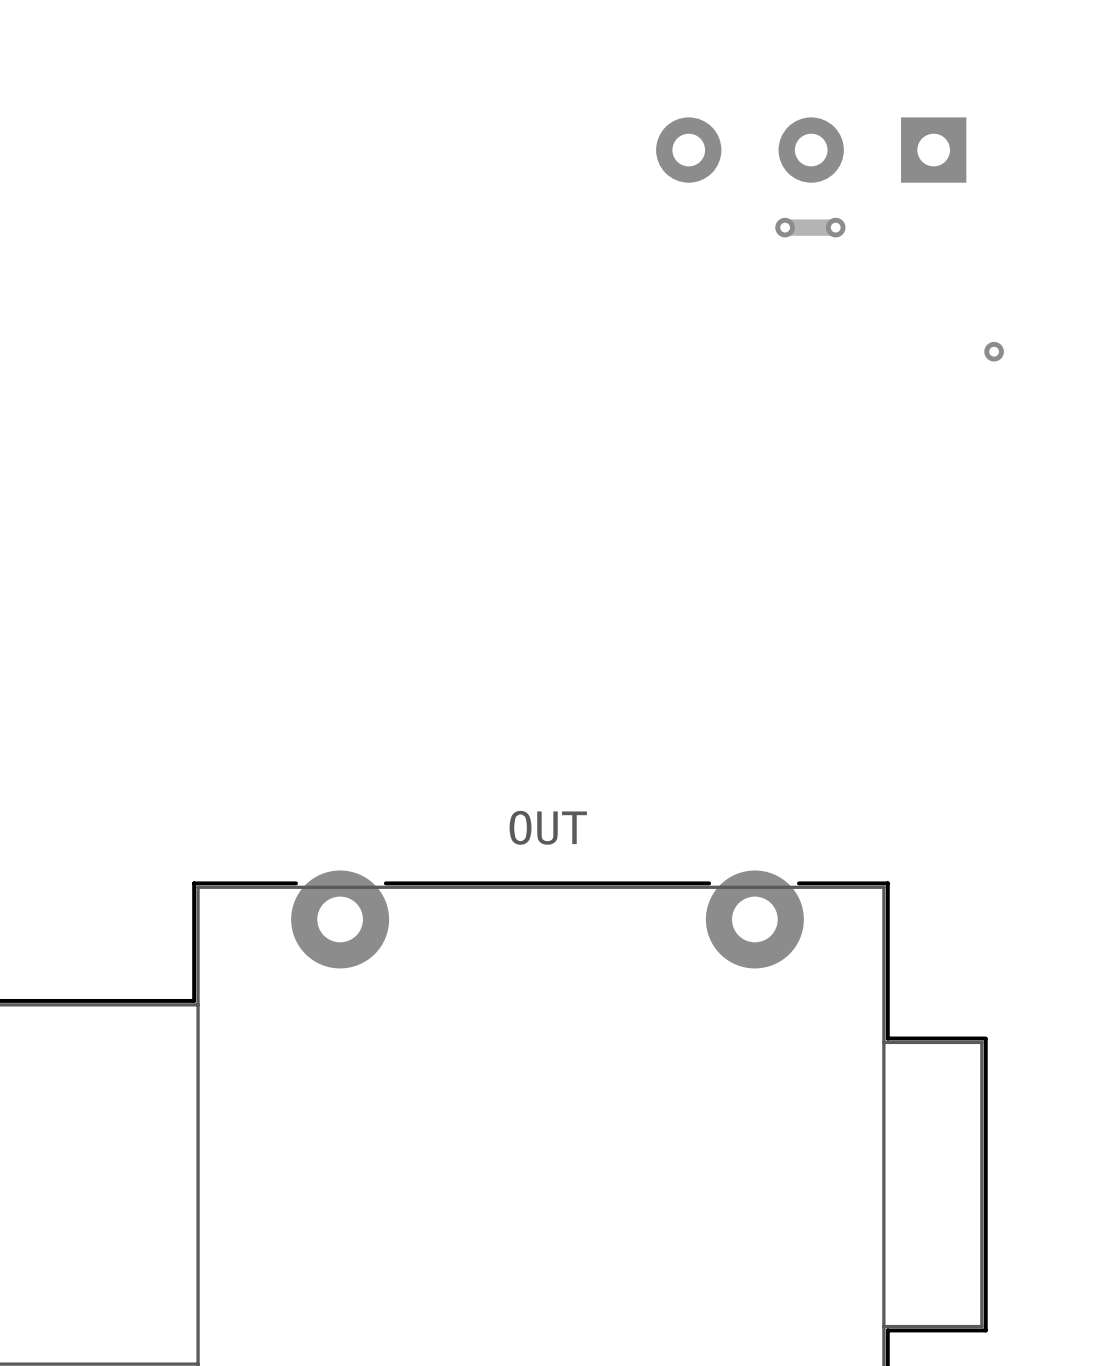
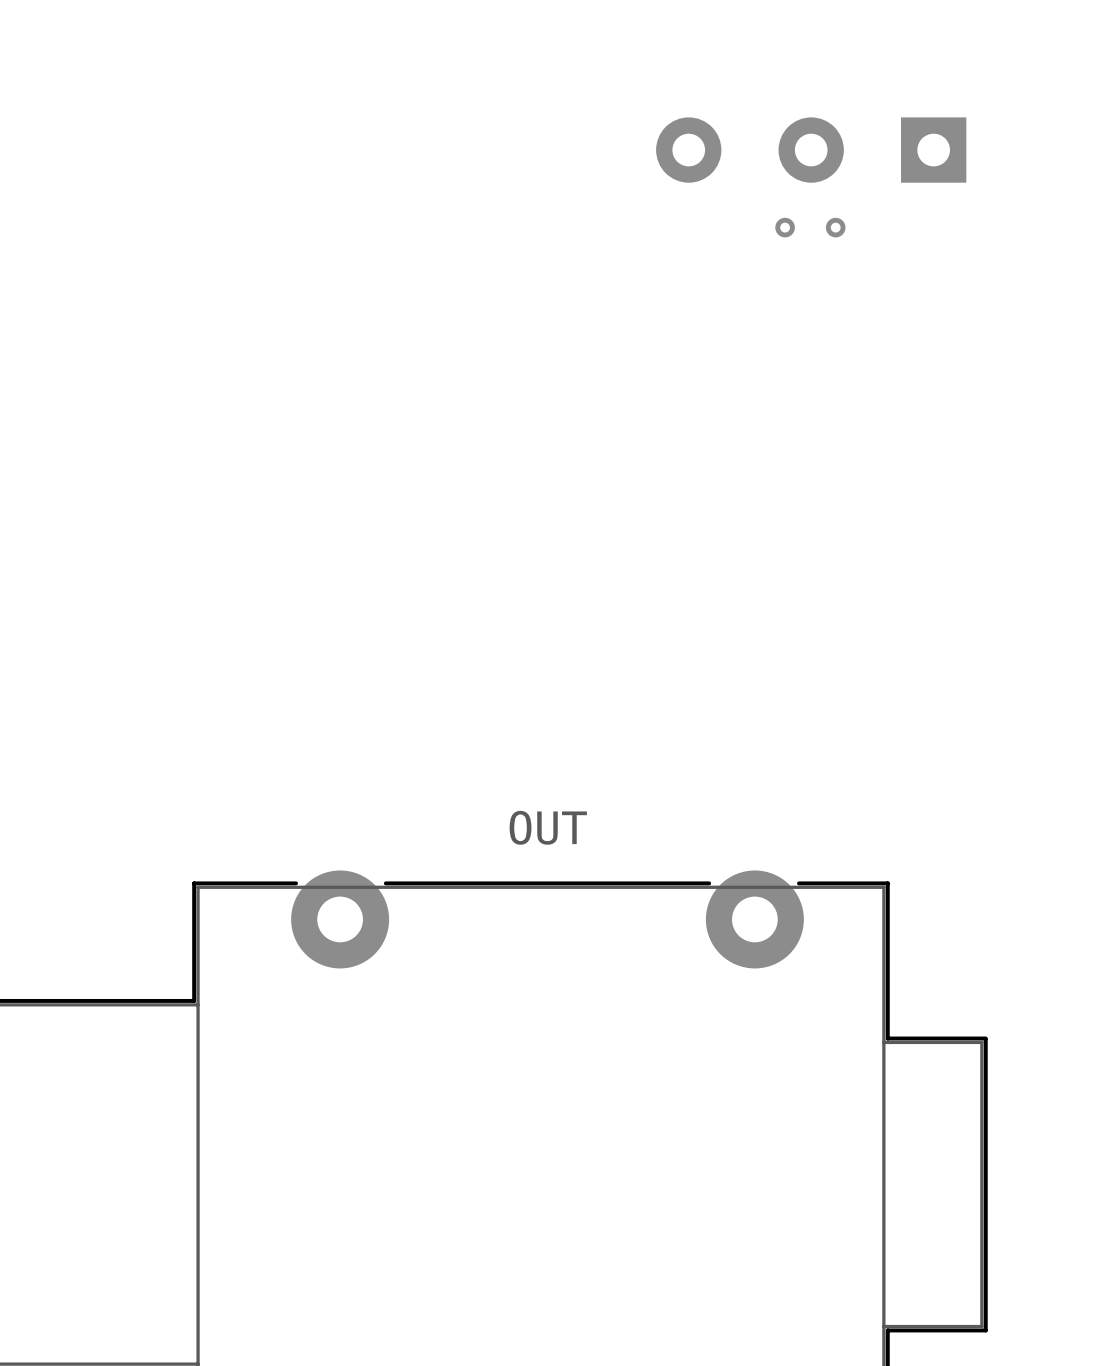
track: (835, 227) (785, 227) -> none
via: (994, 351) -> none

